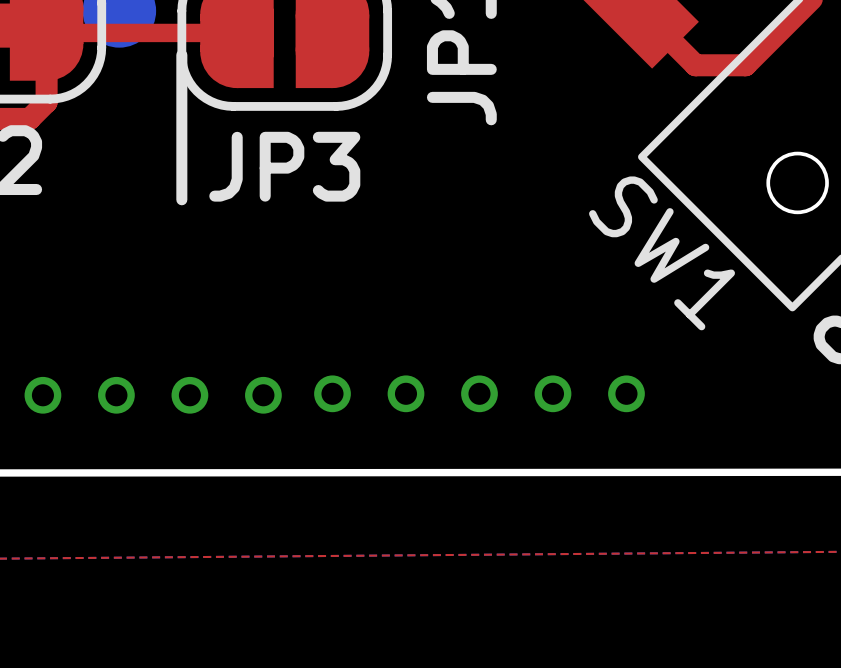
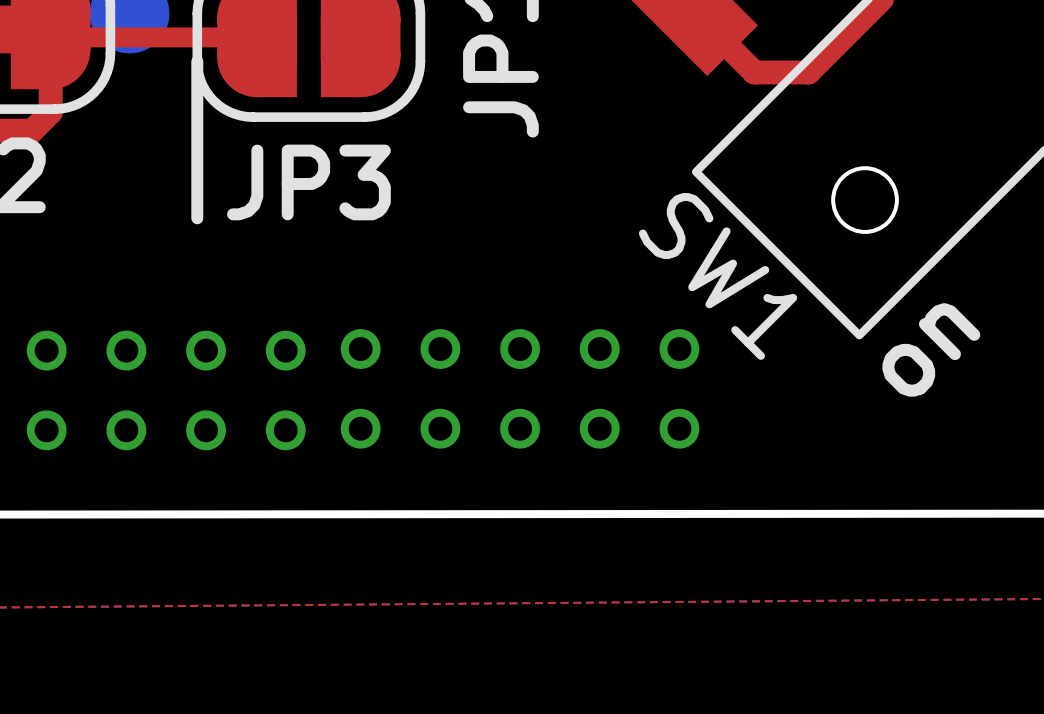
via: none -> (360, 349)
via: none -> (440, 349)
via: none -> (520, 349)
via: none -> (599, 349)
via: none -> (679, 349)
via: none -> (46, 350)
via: none -> (126, 350)
via: none -> (206, 350)
via: none -> (285, 350)

